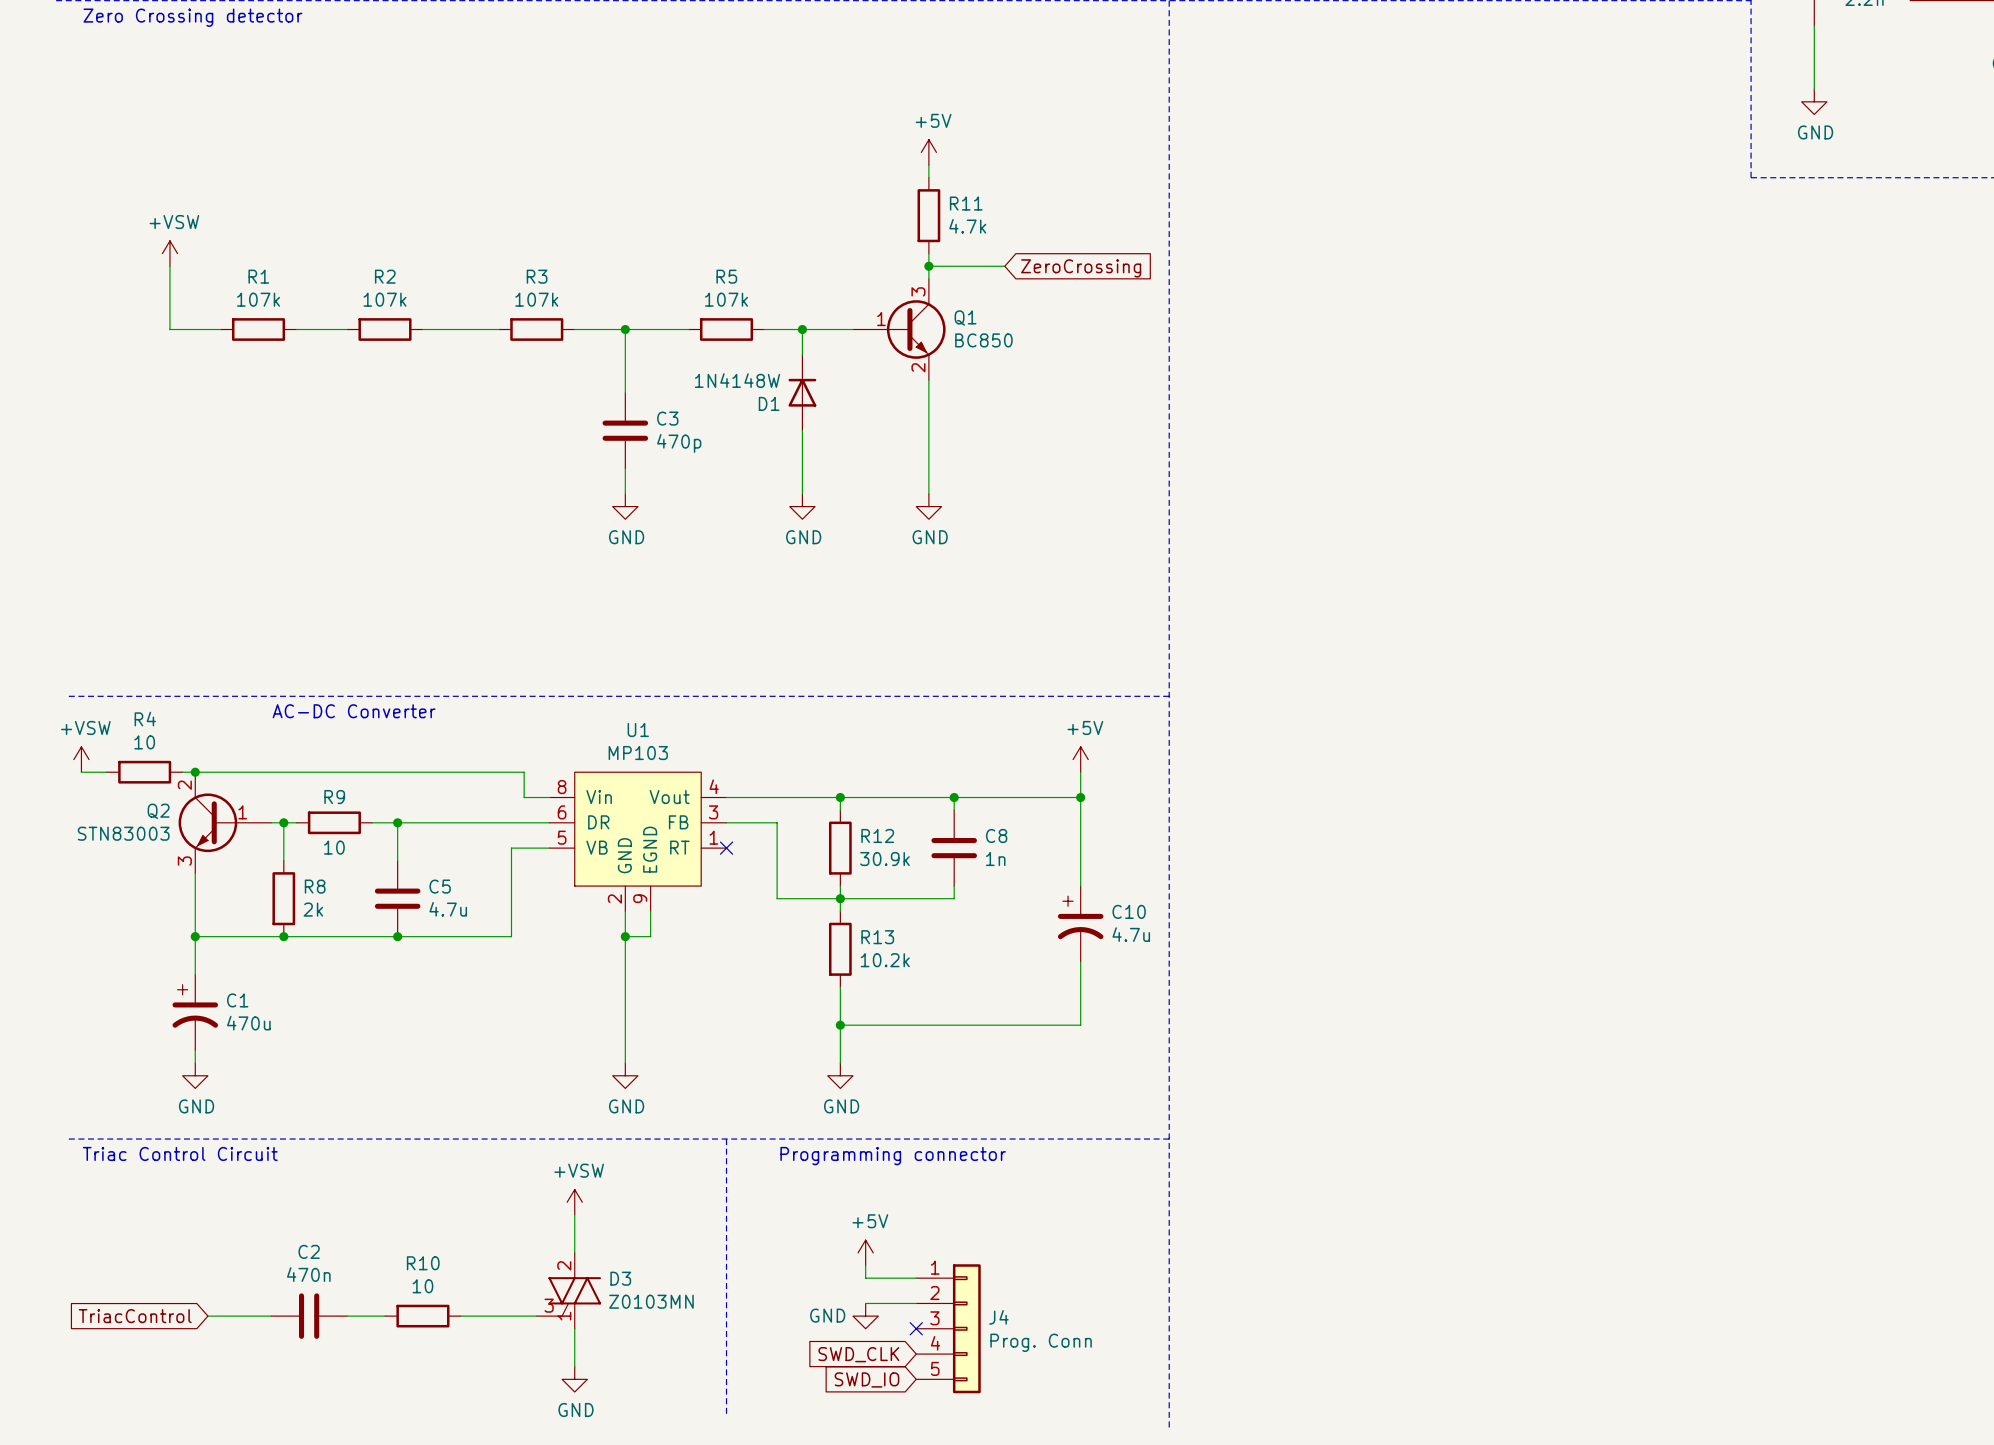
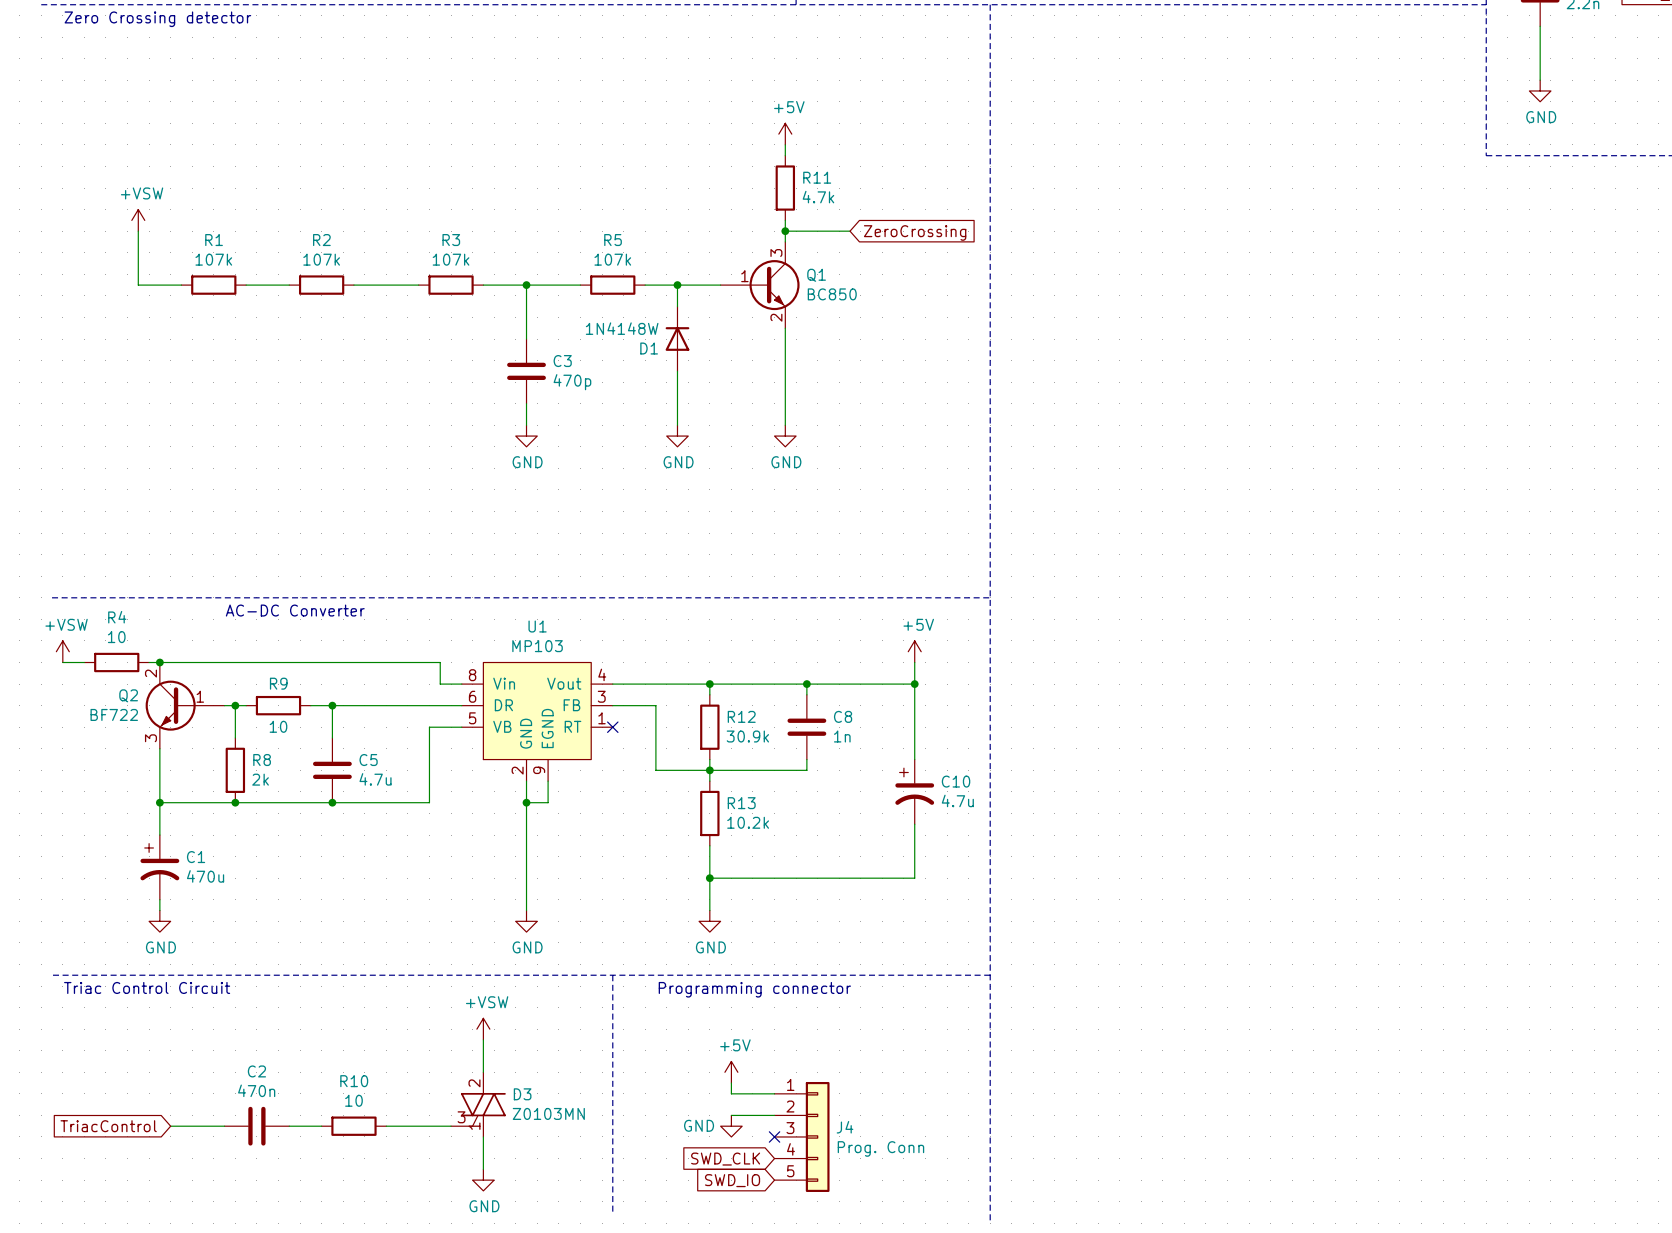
Q2 value: STN83003 (123, 833) -> BF722 (114, 714)

